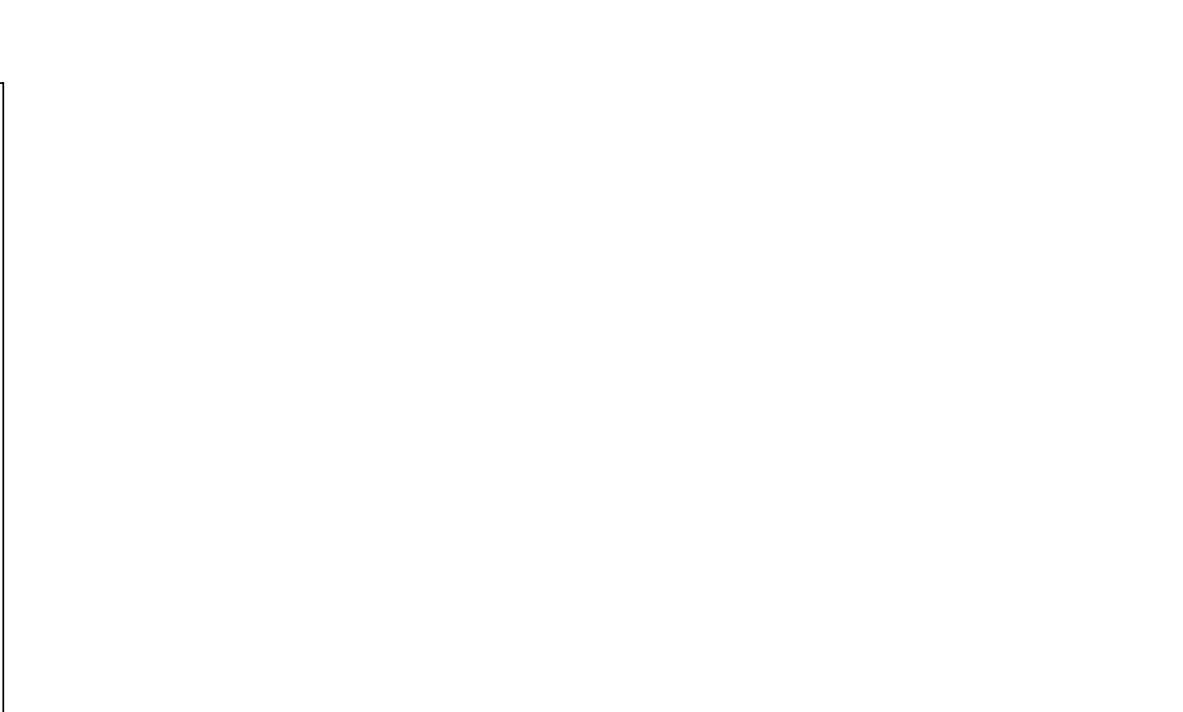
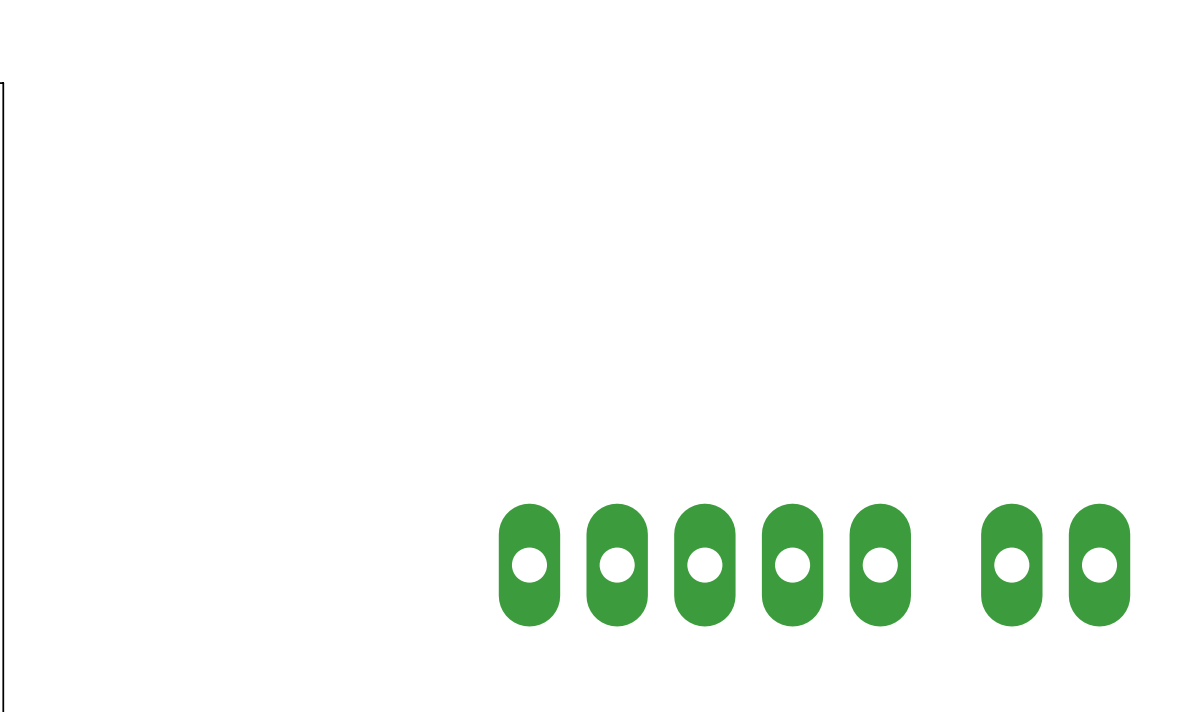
part: none -> (704, 565)
part: none -> (1055, 565)

